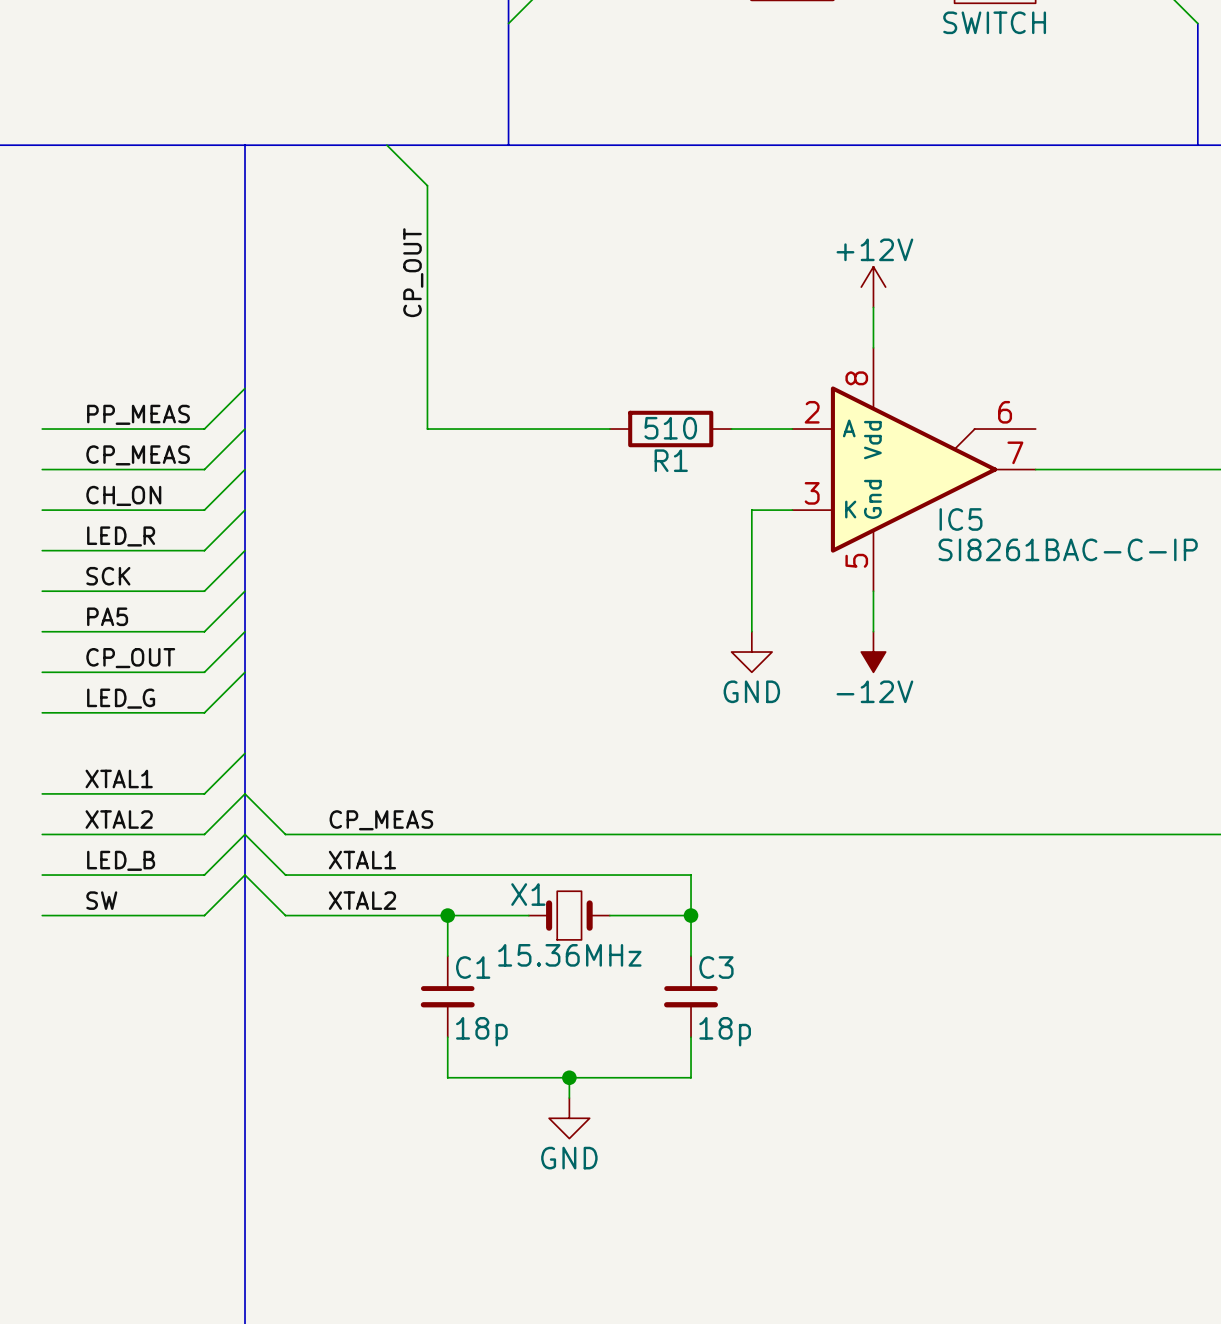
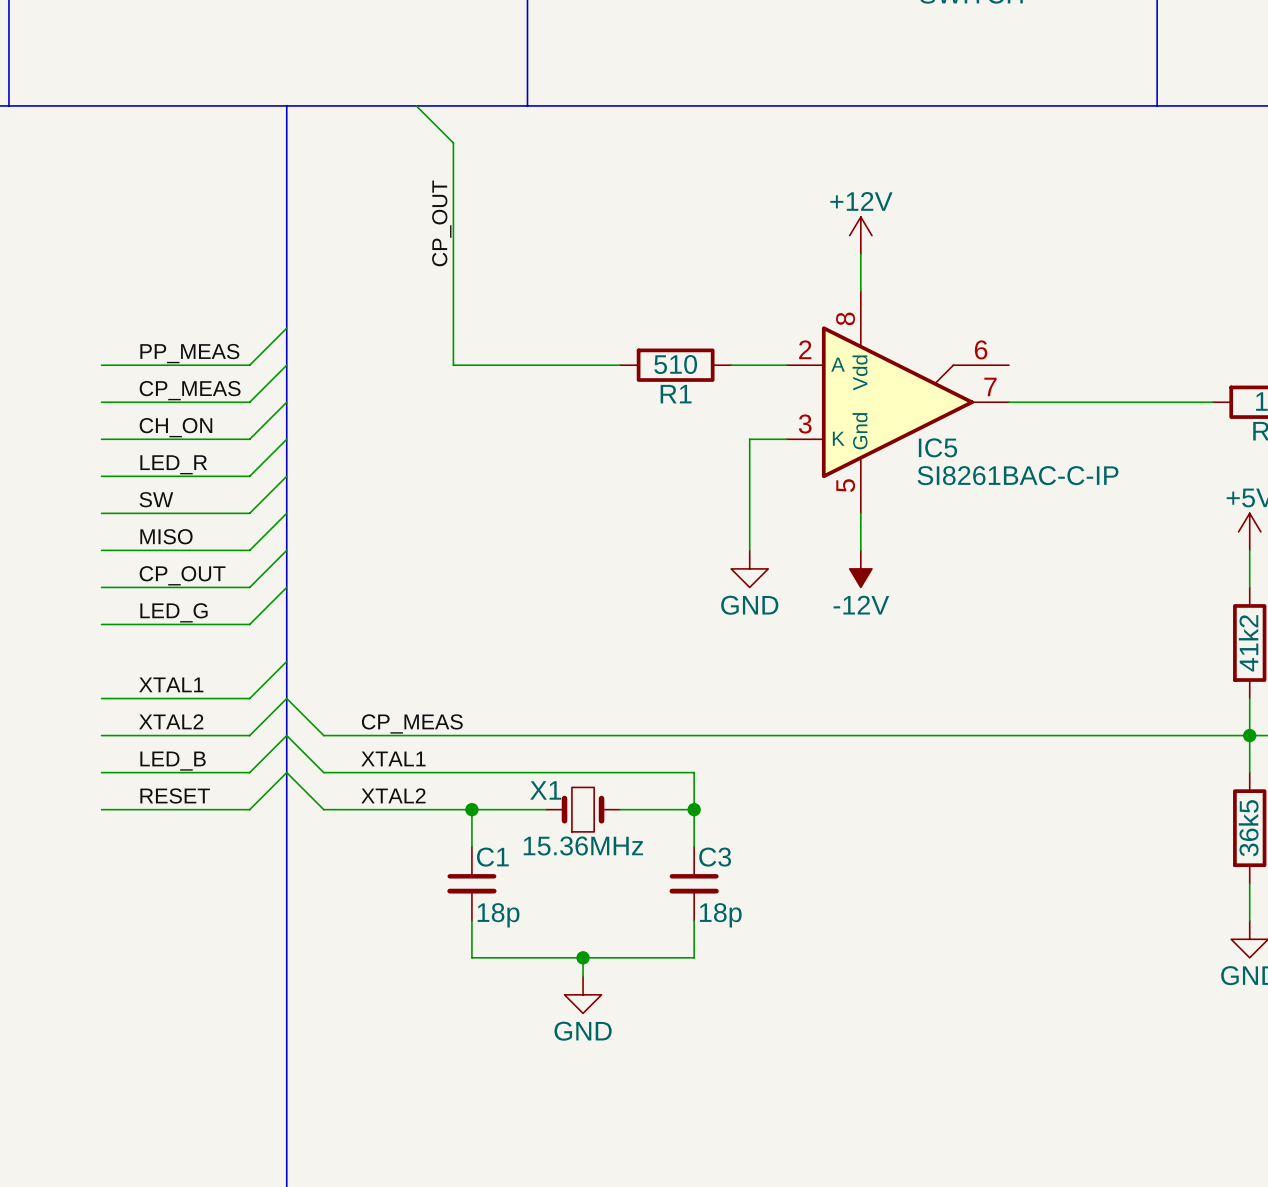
label: SCK (108, 576) -> SW (156, 499)
label: PA5 (107, 616) -> MISO (166, 536)
label: SW (101, 900) -> RESET (175, 795)

